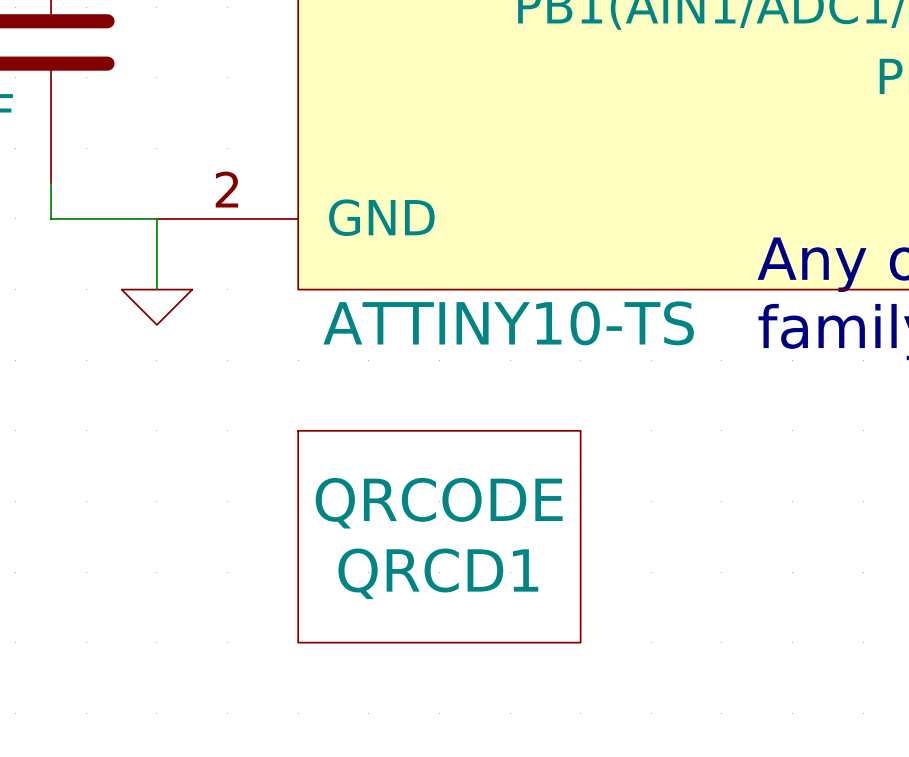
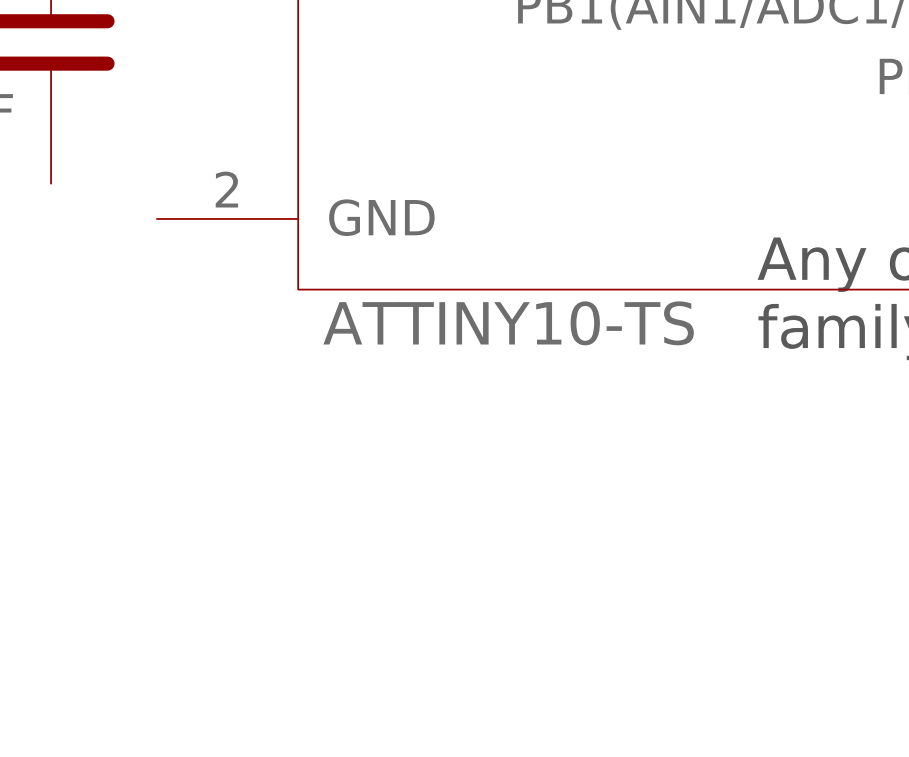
wire: (51, 183) (51, 218) (156, 218) (156, 289) -> none
power symbol: (156, 307) -> none
QRCD1: QRCODE (439, 536) -> none

